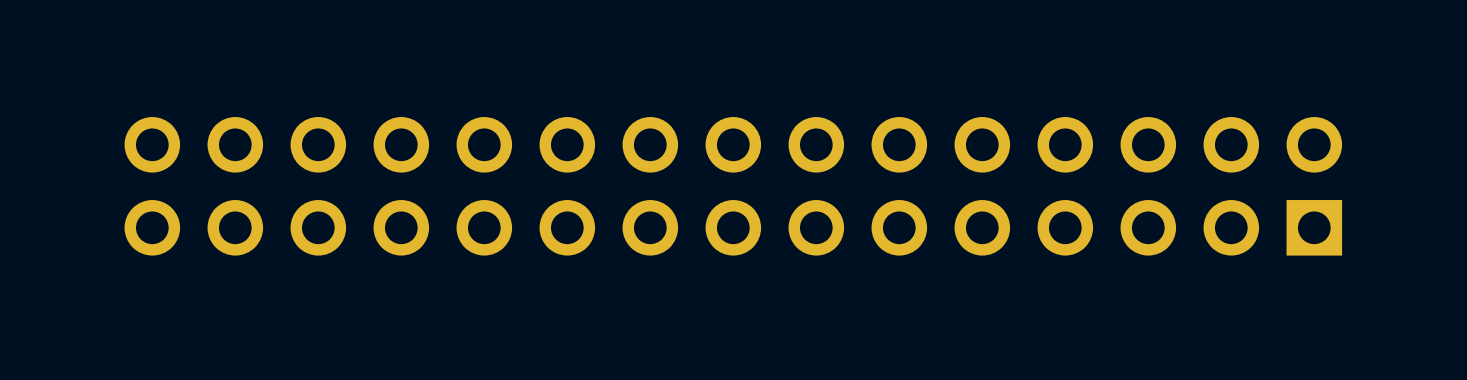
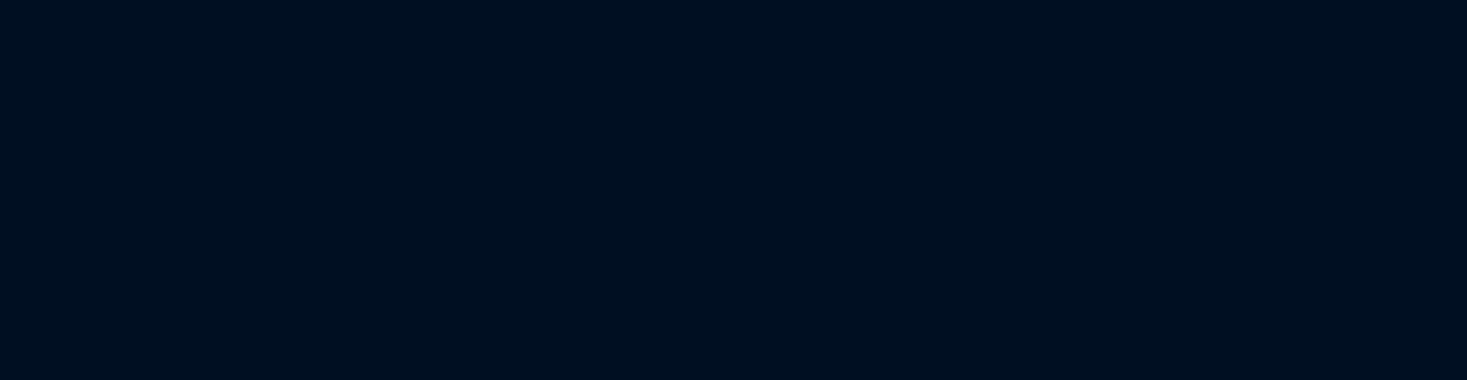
part: (733, 186) -> none

